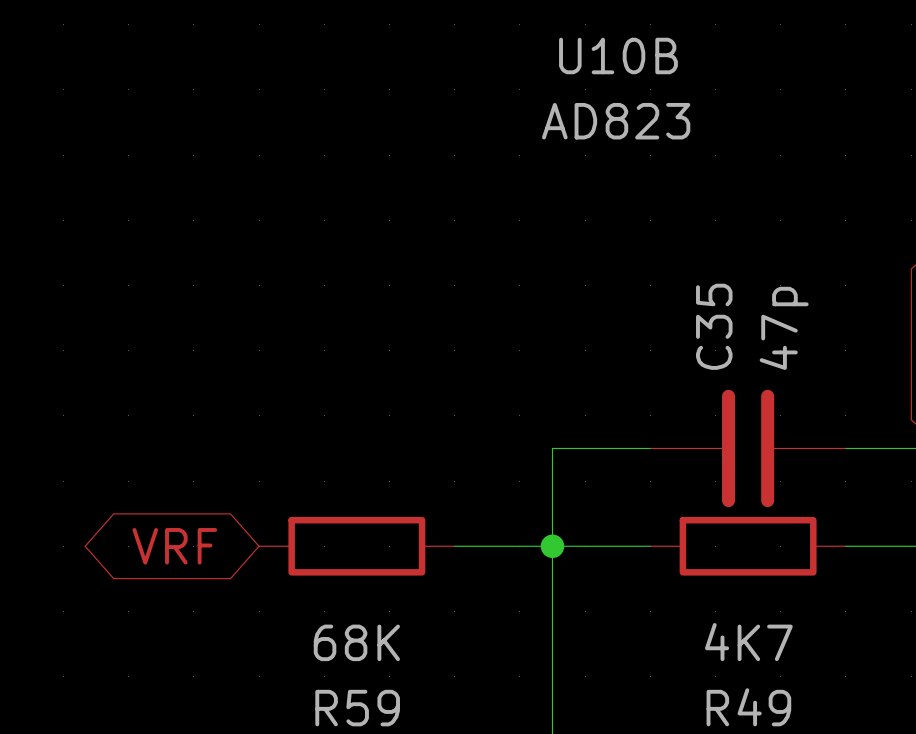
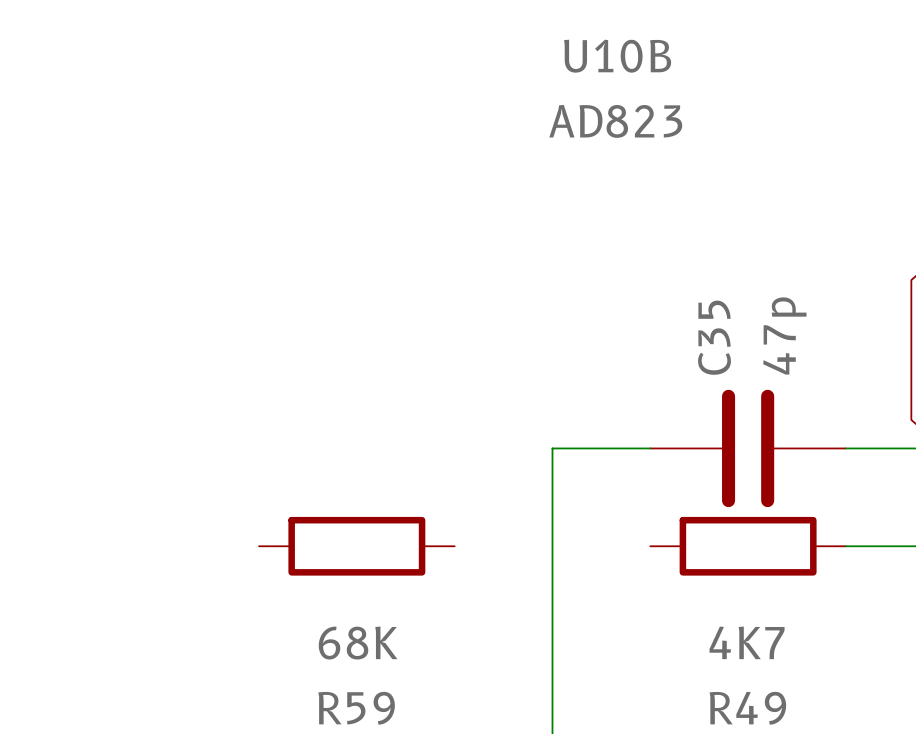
global label: VRF (174, 546) -> none
wire: (454, 546) (650, 546) -> none
junction: (552, 546) -> none

